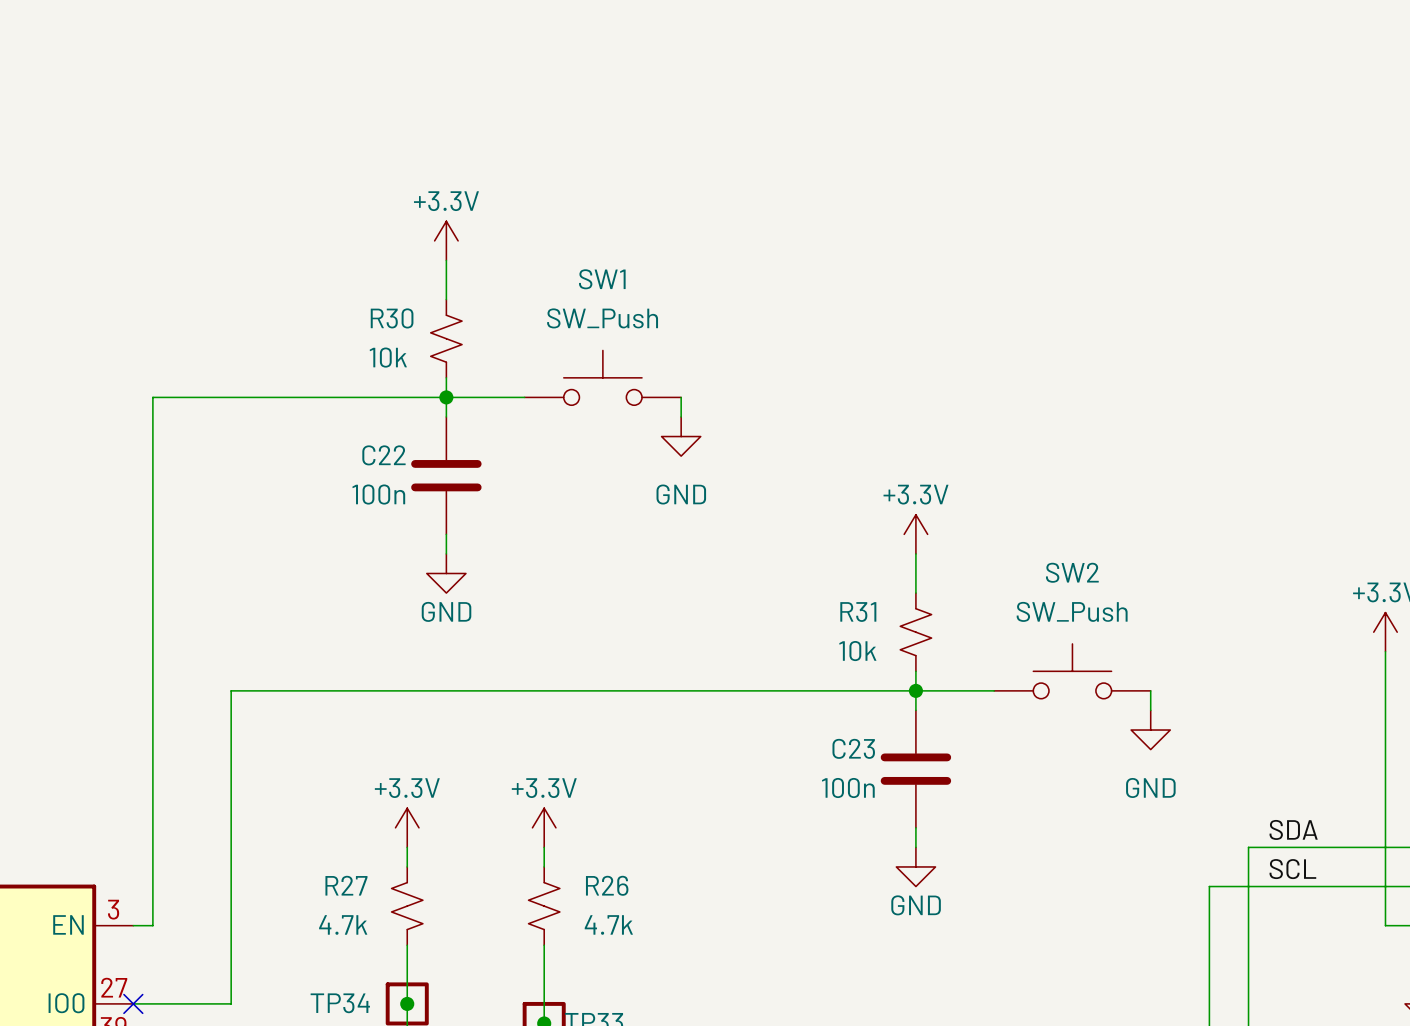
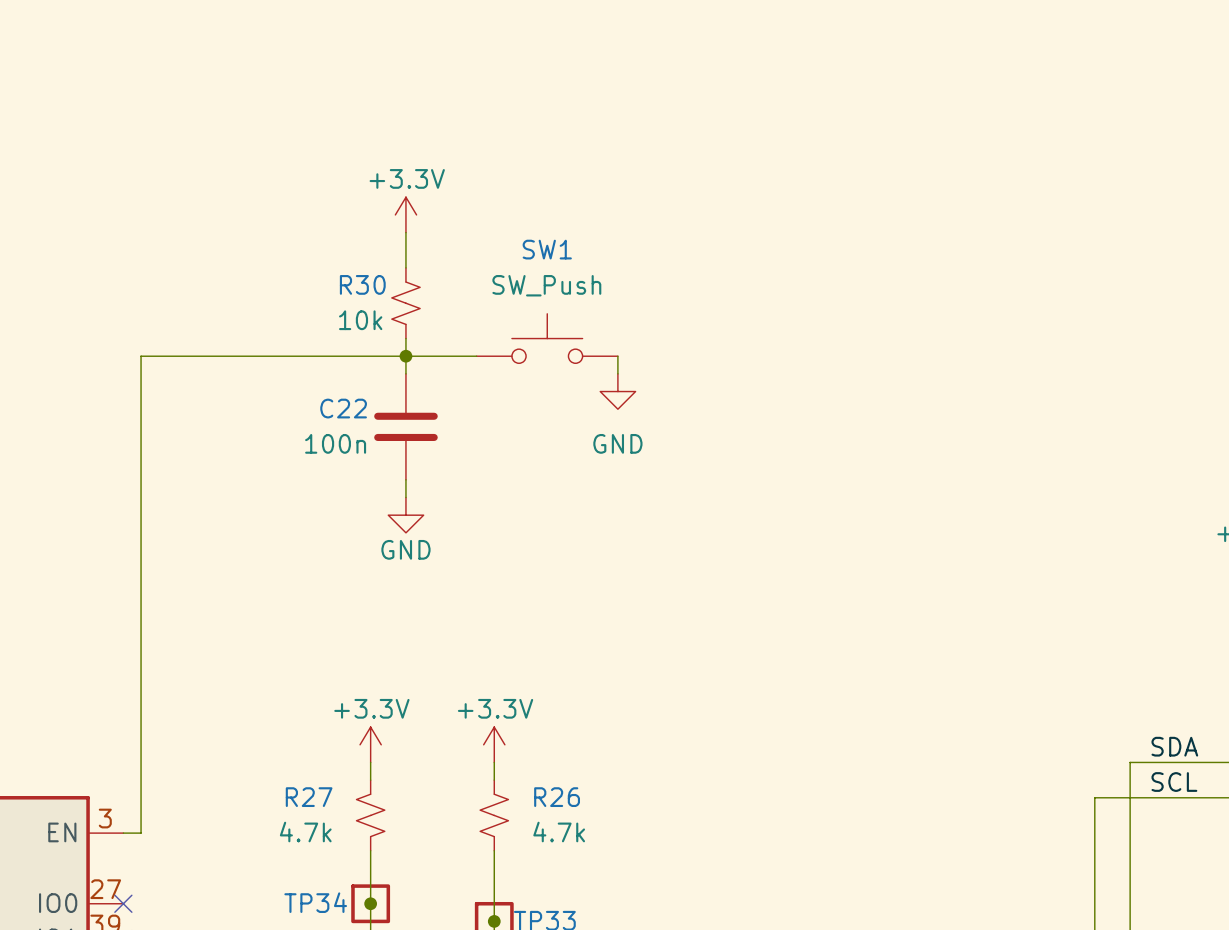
power symbol: +3.3V (915, 534) -> none
wire: (915, 553) (915, 593) -> none
R31: 10k (915, 632) -> none
wire: (915, 671) (915, 710) -> none
SW2: SW_Push (1072, 671) -> none
junction: (915, 690) -> none
wire: (994, 690) (231, 690) (231, 1003) (133, 1003) -> none
wire: (1150, 690) (1150, 710) -> none
power symbol: GND (1150, 730) -> none
C23: 100n (915, 769) -> none
wire: (915, 827) (915, 847) -> none
power symbol: GND (915, 866) -> none

